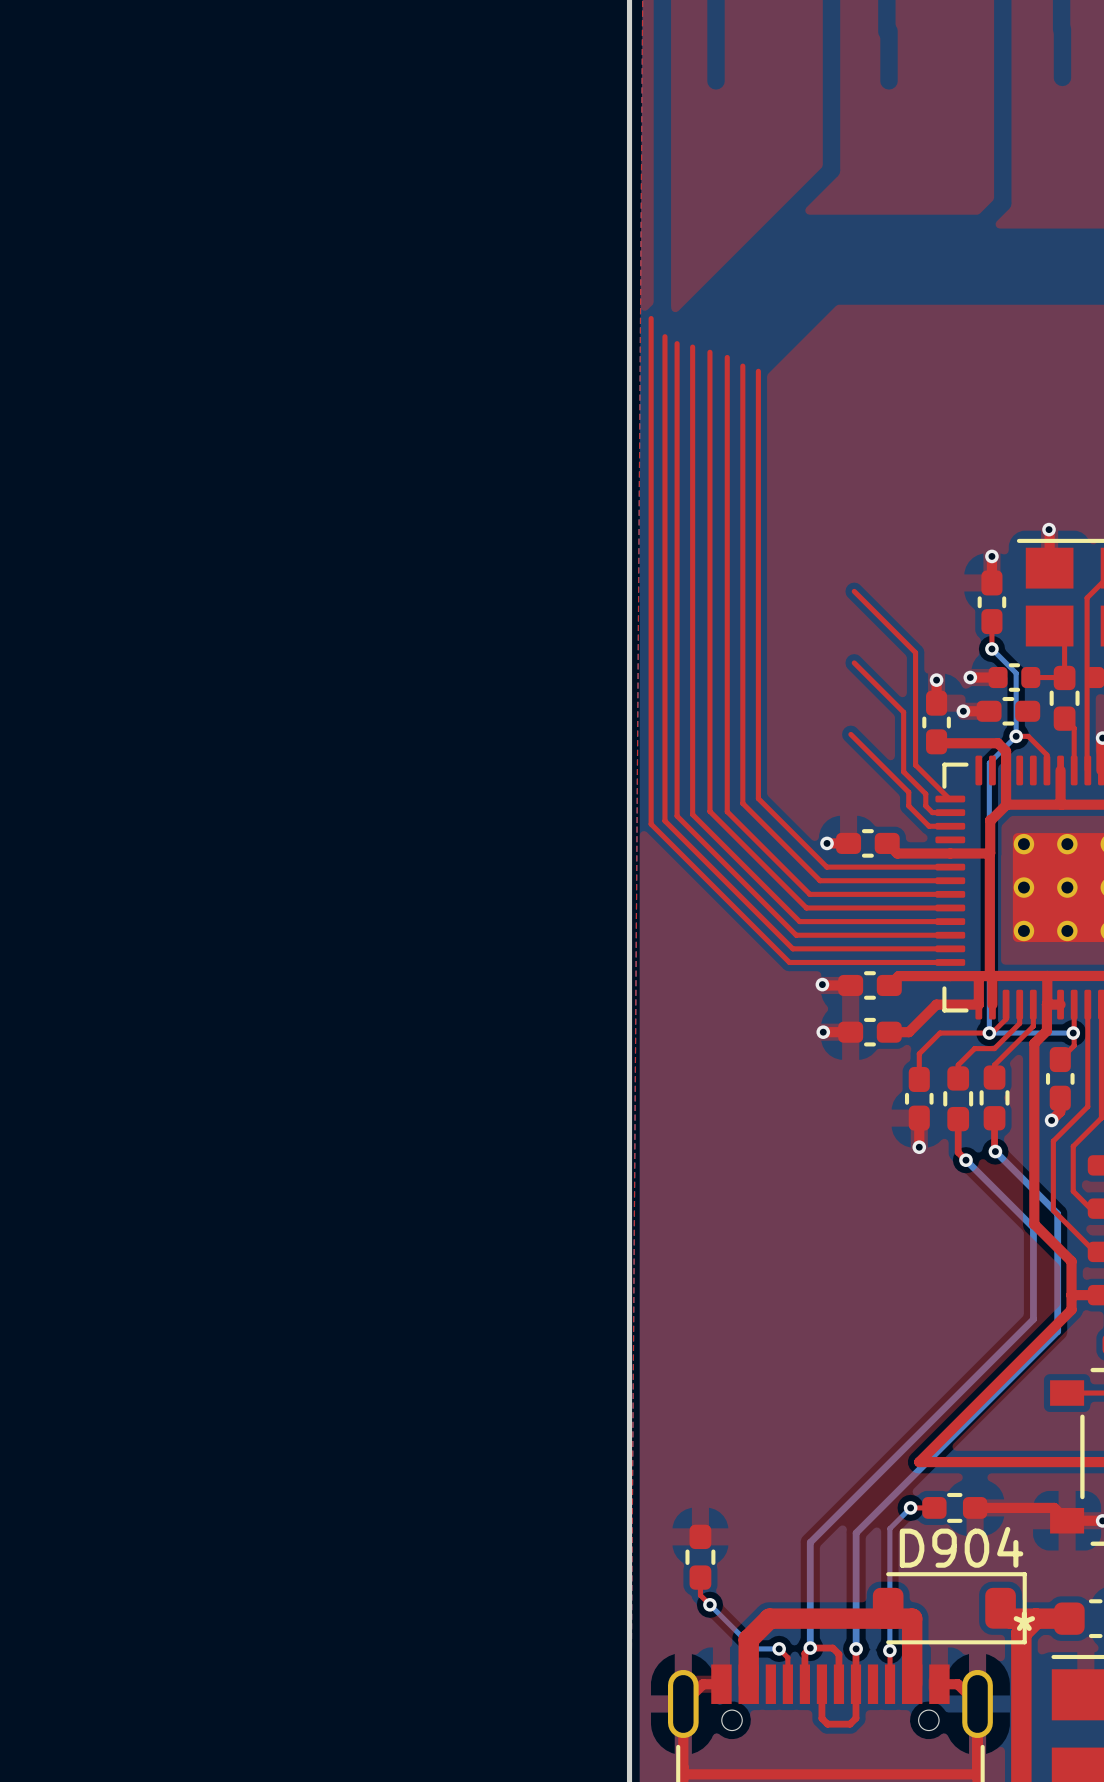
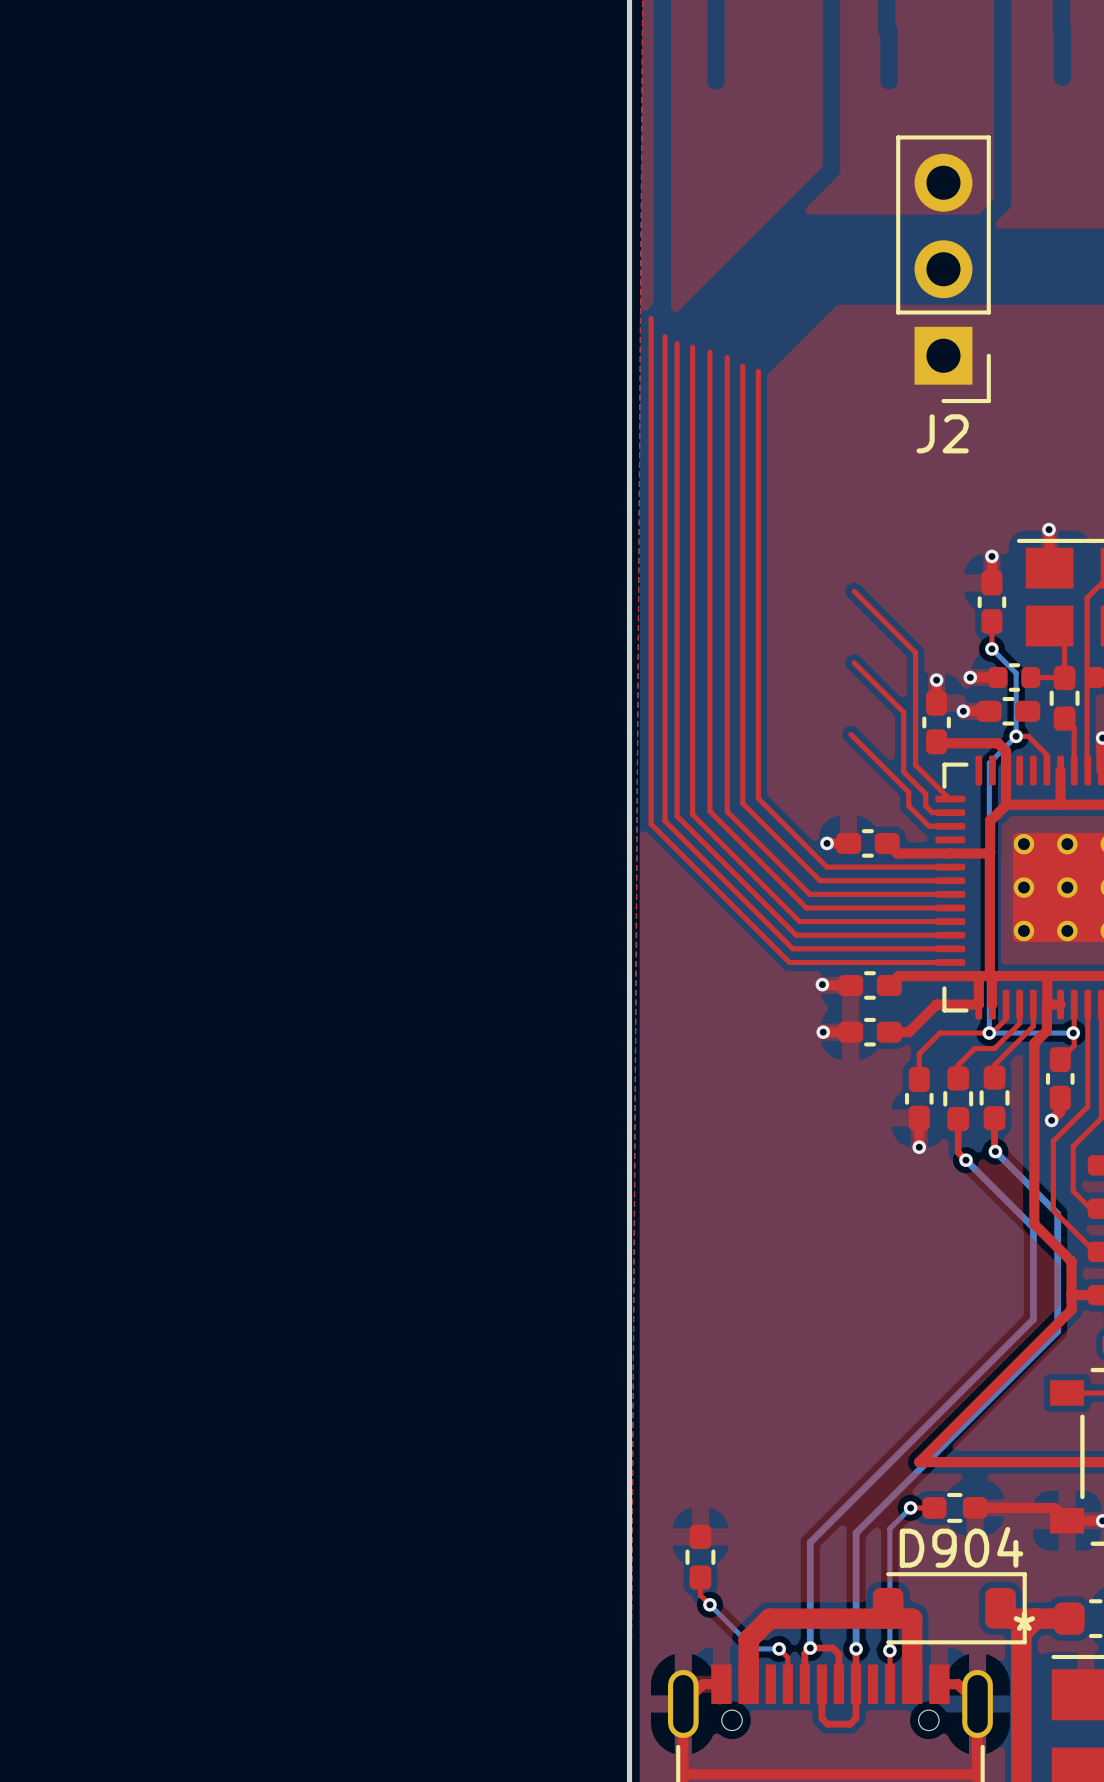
J2: none -> (943, 269)

